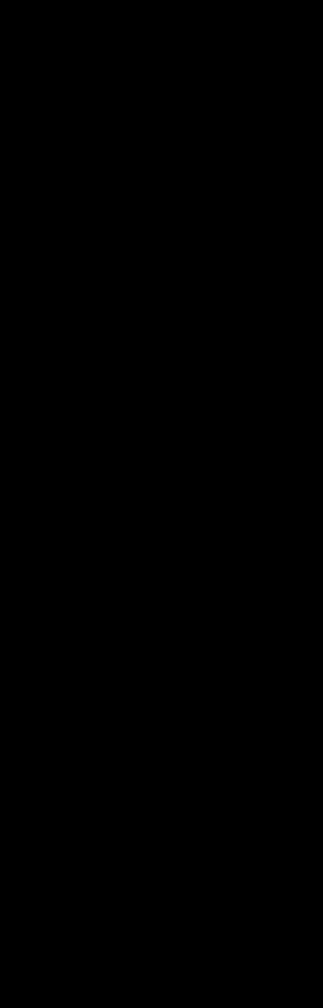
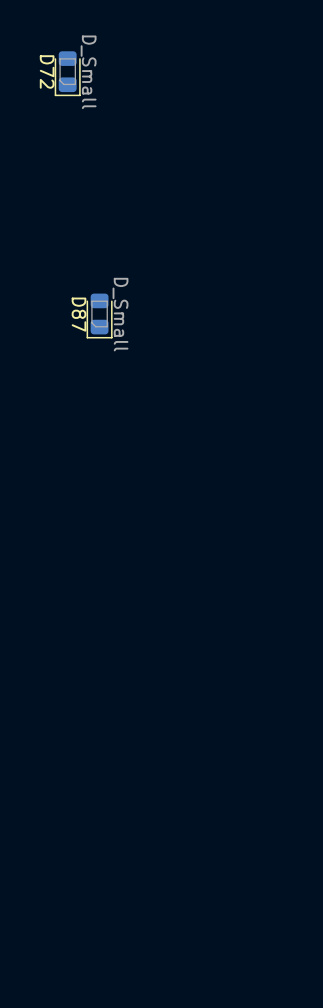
D72: none -> D_Small (67, 73)
D87: none -> D_Small (99, 316)

